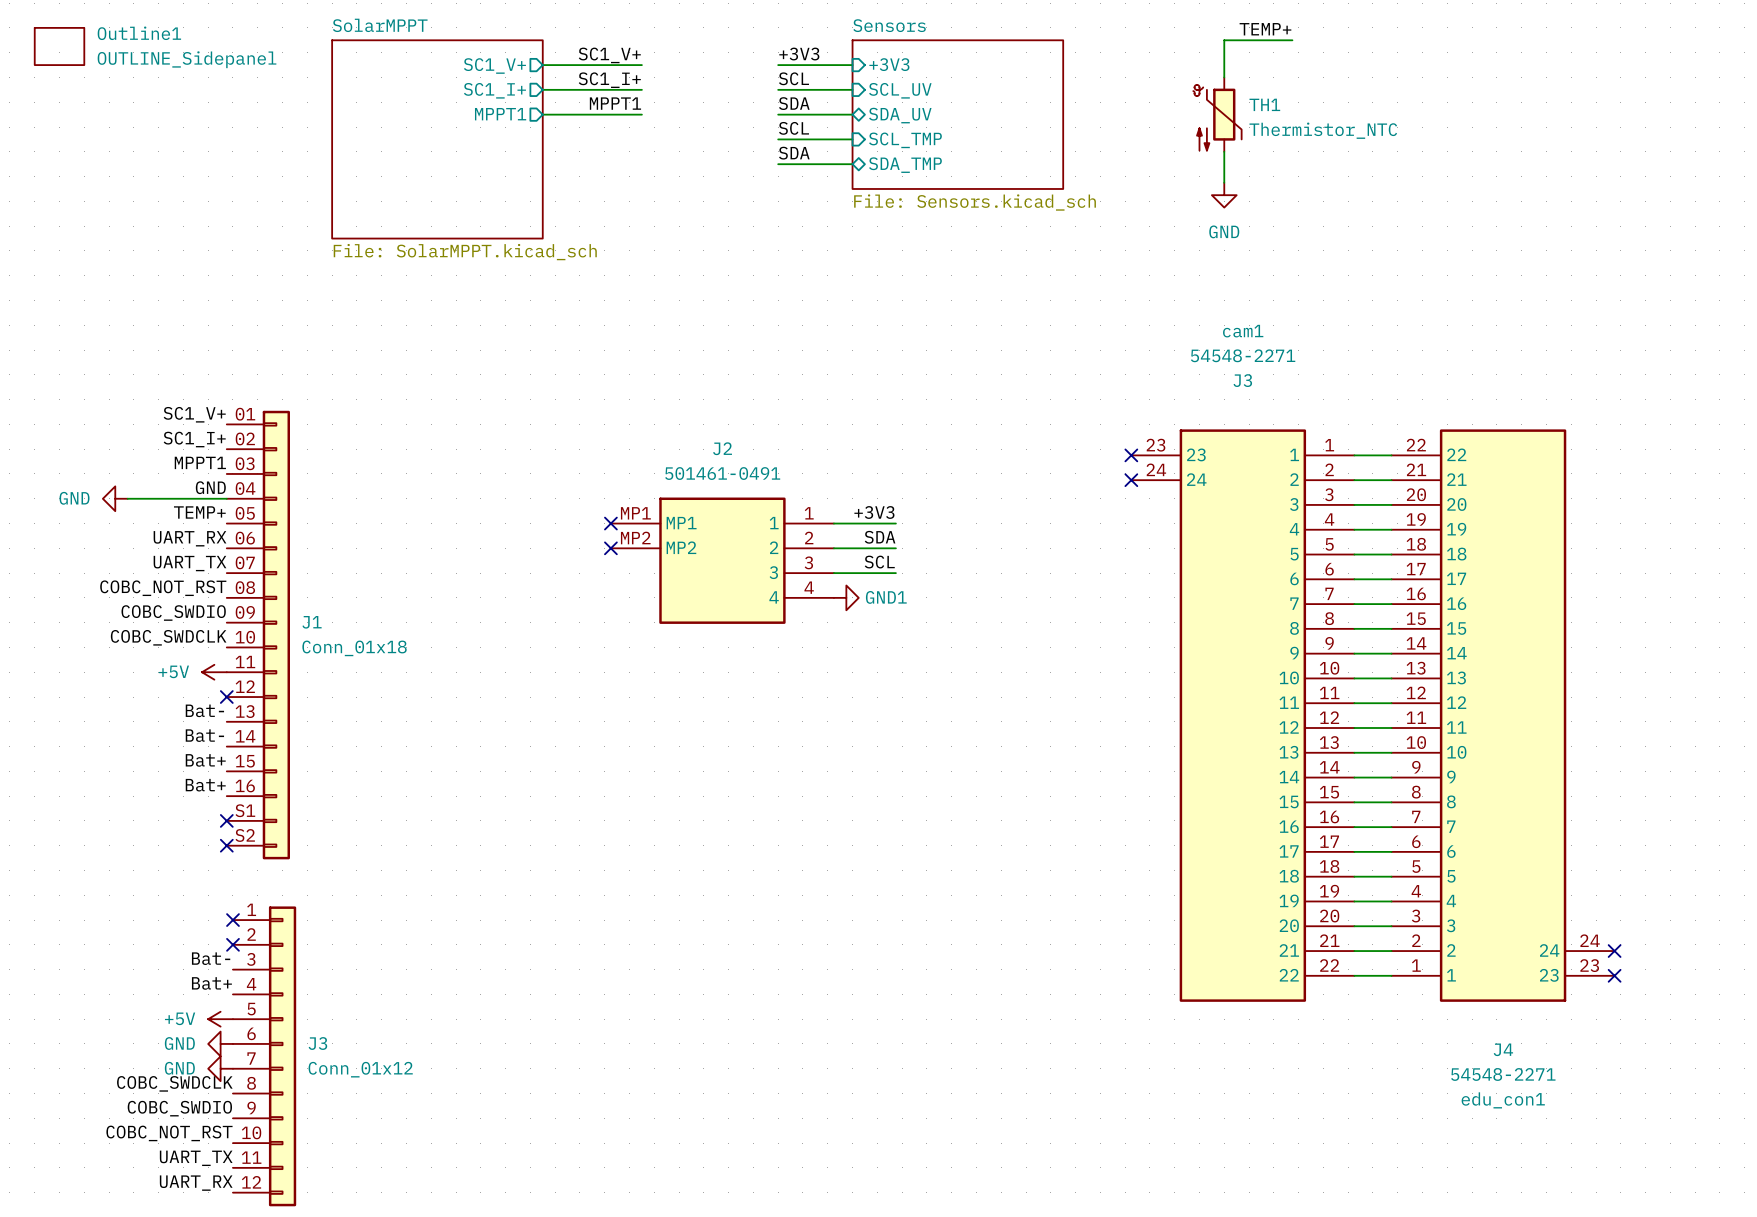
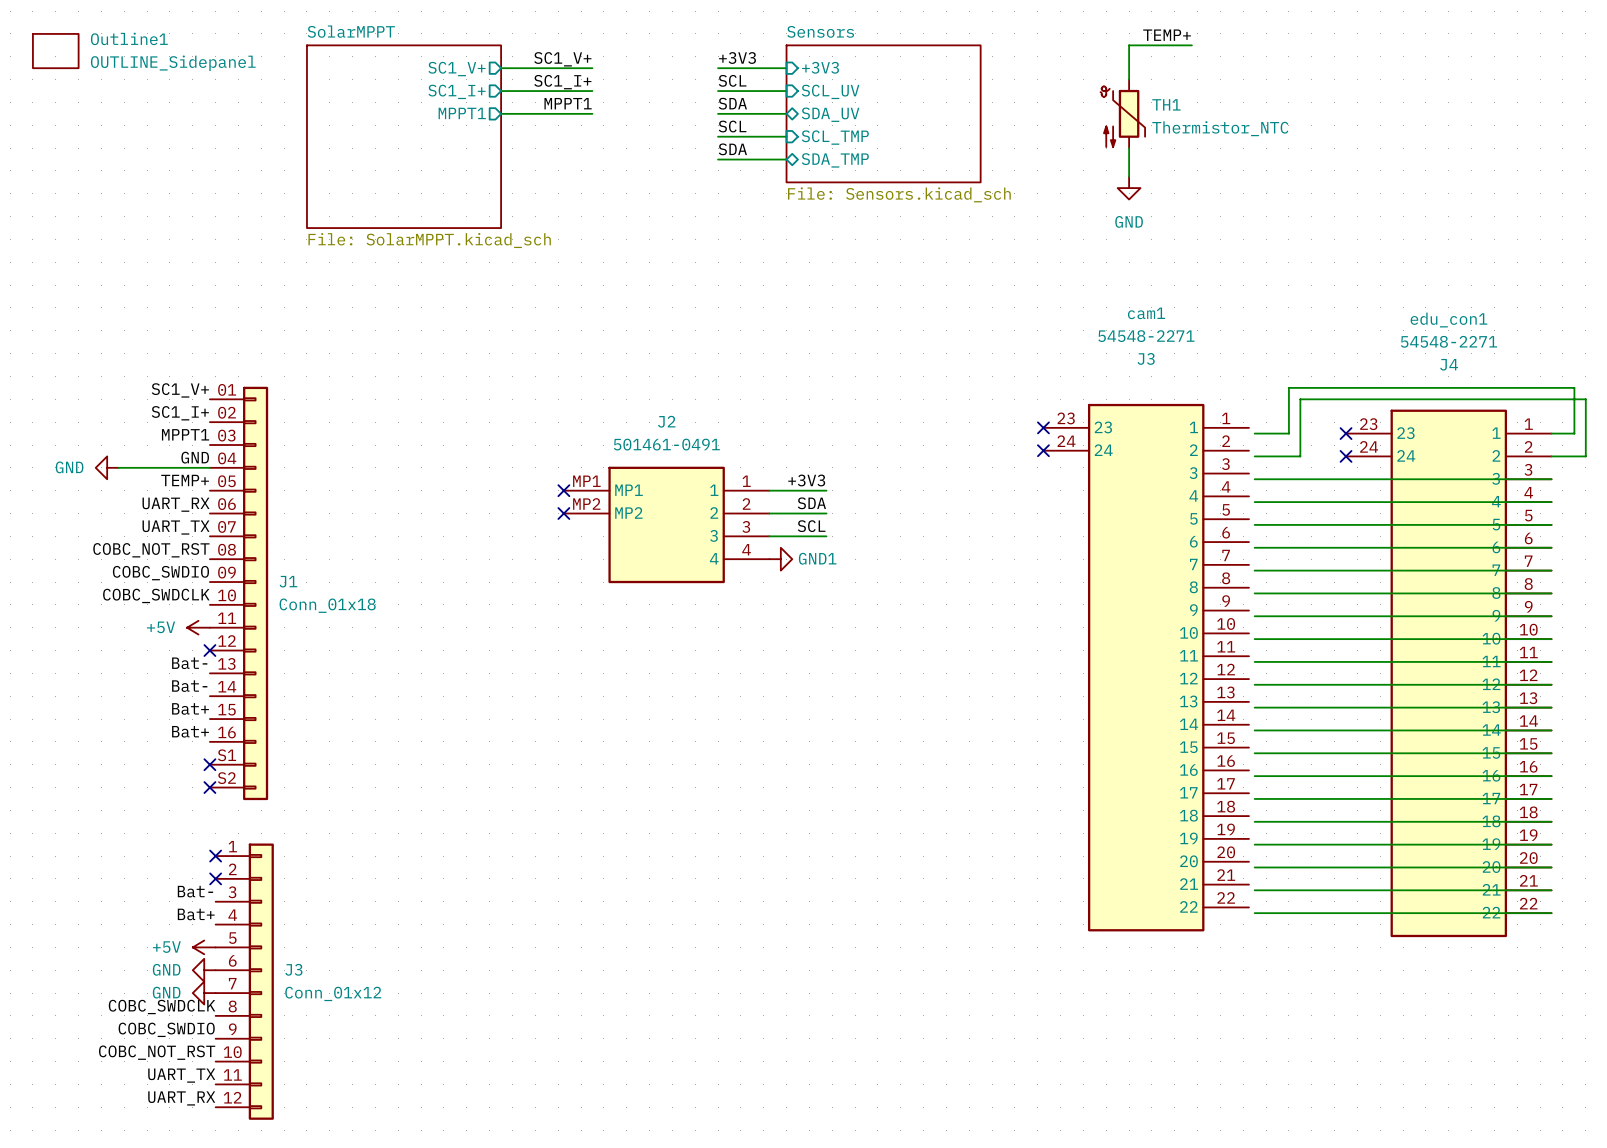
wire: (1354, 455) (1391, 455) -> none
wire: none -> (1254, 433) (1288, 433) (1288, 387) (1574, 387) (1574, 433) (1551, 433)
no-connect mark: none -> (1346, 433)
wire: (1354, 480) (1391, 480) -> none
wire: none -> (1254, 456) (1300, 456) (1300, 399) (1585, 399) (1585, 456) (1551, 456)
no-connect mark: none -> (1346, 456)
wire: (1354, 504) (1391, 504) -> none
wire: none -> (1254, 479) (1551, 479)
wire: (1354, 529) (1391, 529) -> none
wire: none -> (1254, 502) (1551, 502)
wire: (1354, 554) (1391, 554) -> none
wire: none -> (1254, 524) (1551, 524)
wire: (1354, 579) (1391, 579) -> none
wire: none -> (1254, 547) (1551, 547)
wire: (1354, 604) (1391, 604) -> none
wire: none -> (1254, 570) (1551, 570)
wire: (1354, 628) (1391, 628) -> none
wire: none -> (1254, 593) (1551, 593)
wire: (1354, 653) (1391, 653) -> none
wire: none -> (1254, 616) (1551, 616)
wire: (1354, 678) (1391, 678) -> none
wire: none -> (1254, 639) (1551, 639)
wire: (1354, 703) (1391, 703) -> none
wire: none -> (1254, 661) (1551, 661)
edu_con1 rotation: 0° (1503, 715) -> 180° (1448, 673)
wire: (1354, 727) (1391, 727) -> none
wire: none -> (1254, 684) (1551, 684)
wire: (1354, 752) (1391, 752) -> none
wire: none -> (1254, 707) (1551, 707)
wire: (1354, 777) (1391, 777) -> none
wire: none -> (1254, 730) (1551, 730)
wire: (1354, 802) (1391, 802) -> none
wire: none -> (1254, 753) (1551, 753)
wire: (1354, 827) (1391, 827) -> none
wire: none -> (1254, 776) (1551, 776)
wire: (1354, 851) (1391, 851) -> none
wire: none -> (1254, 798) (1551, 798)
wire: (1354, 876) (1391, 876) -> none
wire: none -> (1254, 821) (1551, 821)
wire: (1354, 901) (1391, 901) -> none
wire: none -> (1254, 844) (1551, 844)
wire: (1354, 926) (1391, 926) -> none
wire: none -> (1254, 867) (1551, 867)
wire: (1354, 951) (1391, 951) -> none
no-connect mark: (1614, 951) -> none
wire: none -> (1254, 890) (1551, 890)
wire: (1354, 975) (1391, 975) -> none
no-connect mark: (1614, 975) -> none
wire: none -> (1254, 913) (1551, 913)

